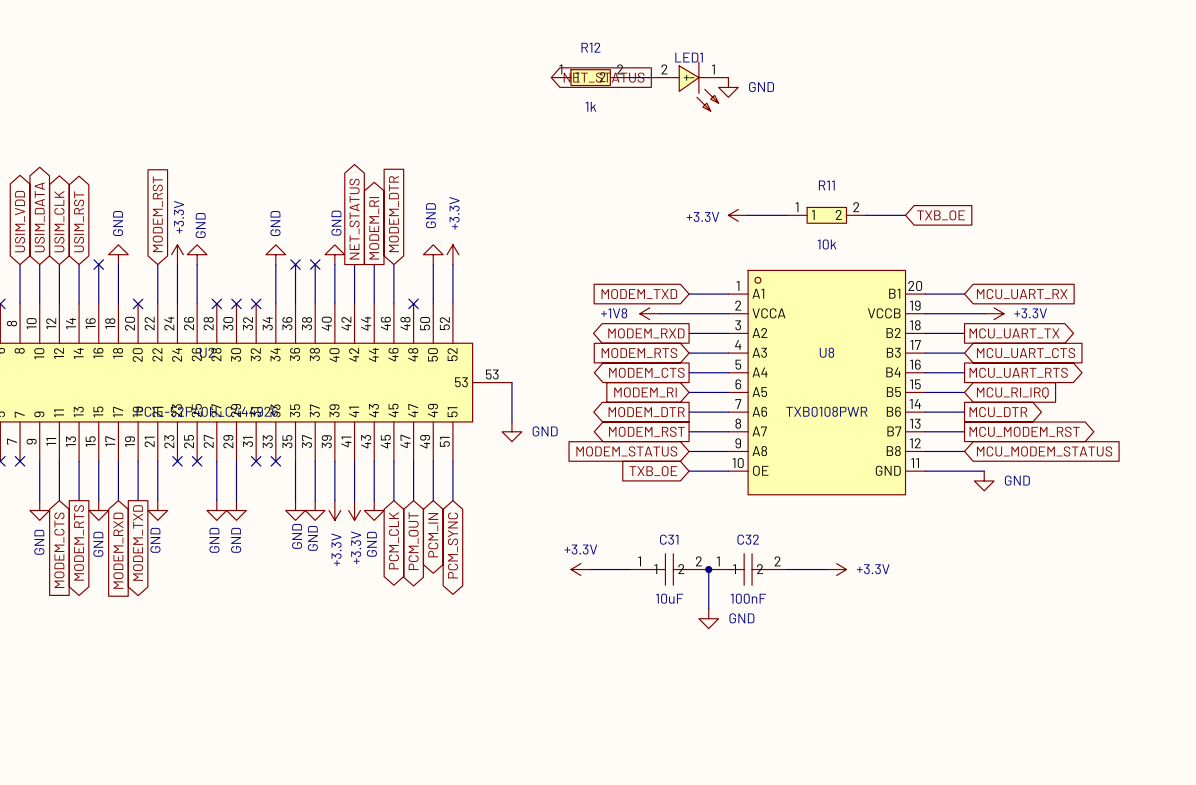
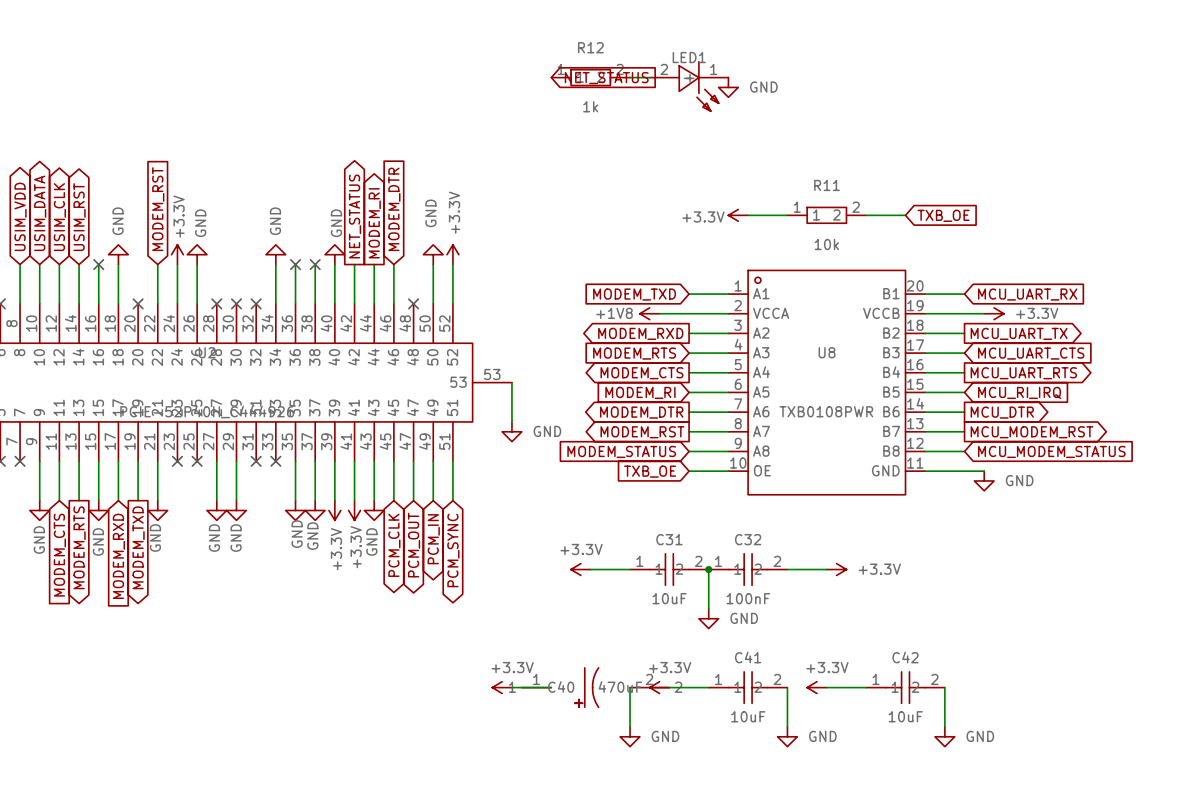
power symbol: none -> +3.3V (502, 687)
wire: none -> (511, 687) (551, 687)
C40: none -> 470uF (595, 687)
wire: none -> (630, 687) (630, 726)
power symbol: none -> +3.3V (659, 687)
wire: none -> (669, 687) (708, 687)
C41: none -> 10uF (748, 687)
wire: none -> (787, 687) (787, 726)
power symbol: none -> +3.3V (816, 687)
wire: none -> (826, 687) (866, 687)
C42: none -> 10uF (905, 687)
wire: none -> (944, 687) (944, 726)
power symbol: none -> GND (630, 736)
power symbol: none -> GND (787, 736)
power symbol: none -> GND (944, 736)

